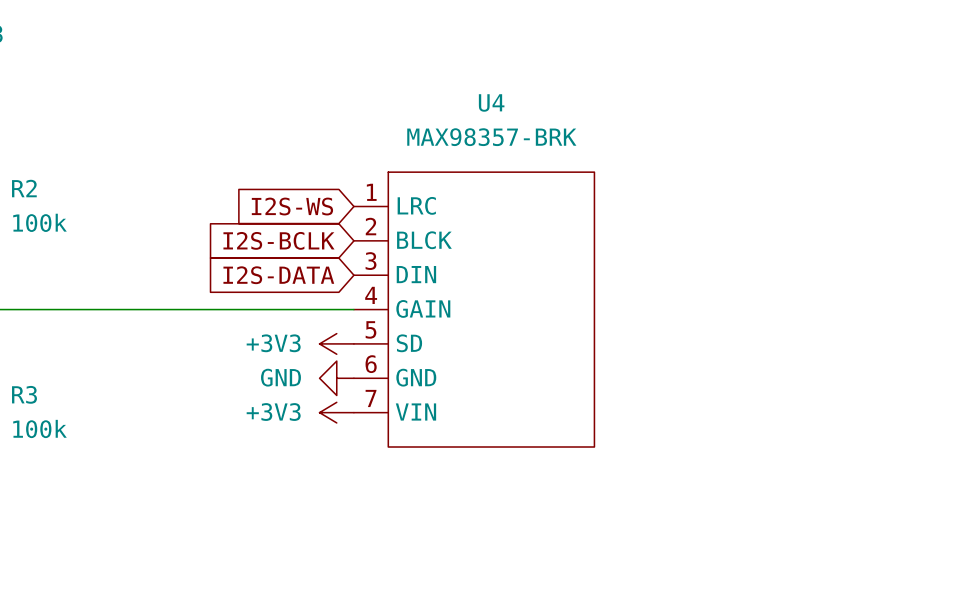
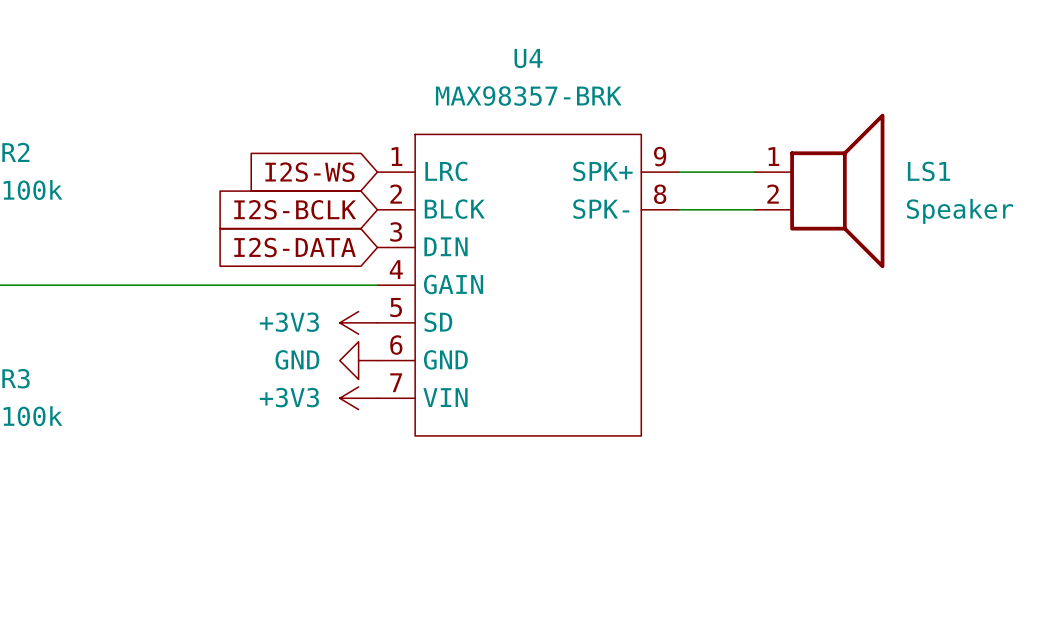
U4 symbol: [353, 172, 595, 448] -> [377, 134, 679, 436]
wire: none -> (678, 172) (754, 172)
LS1: none -> Speaker (819, 190)
wire: none -> (678, 209) (754, 209)

